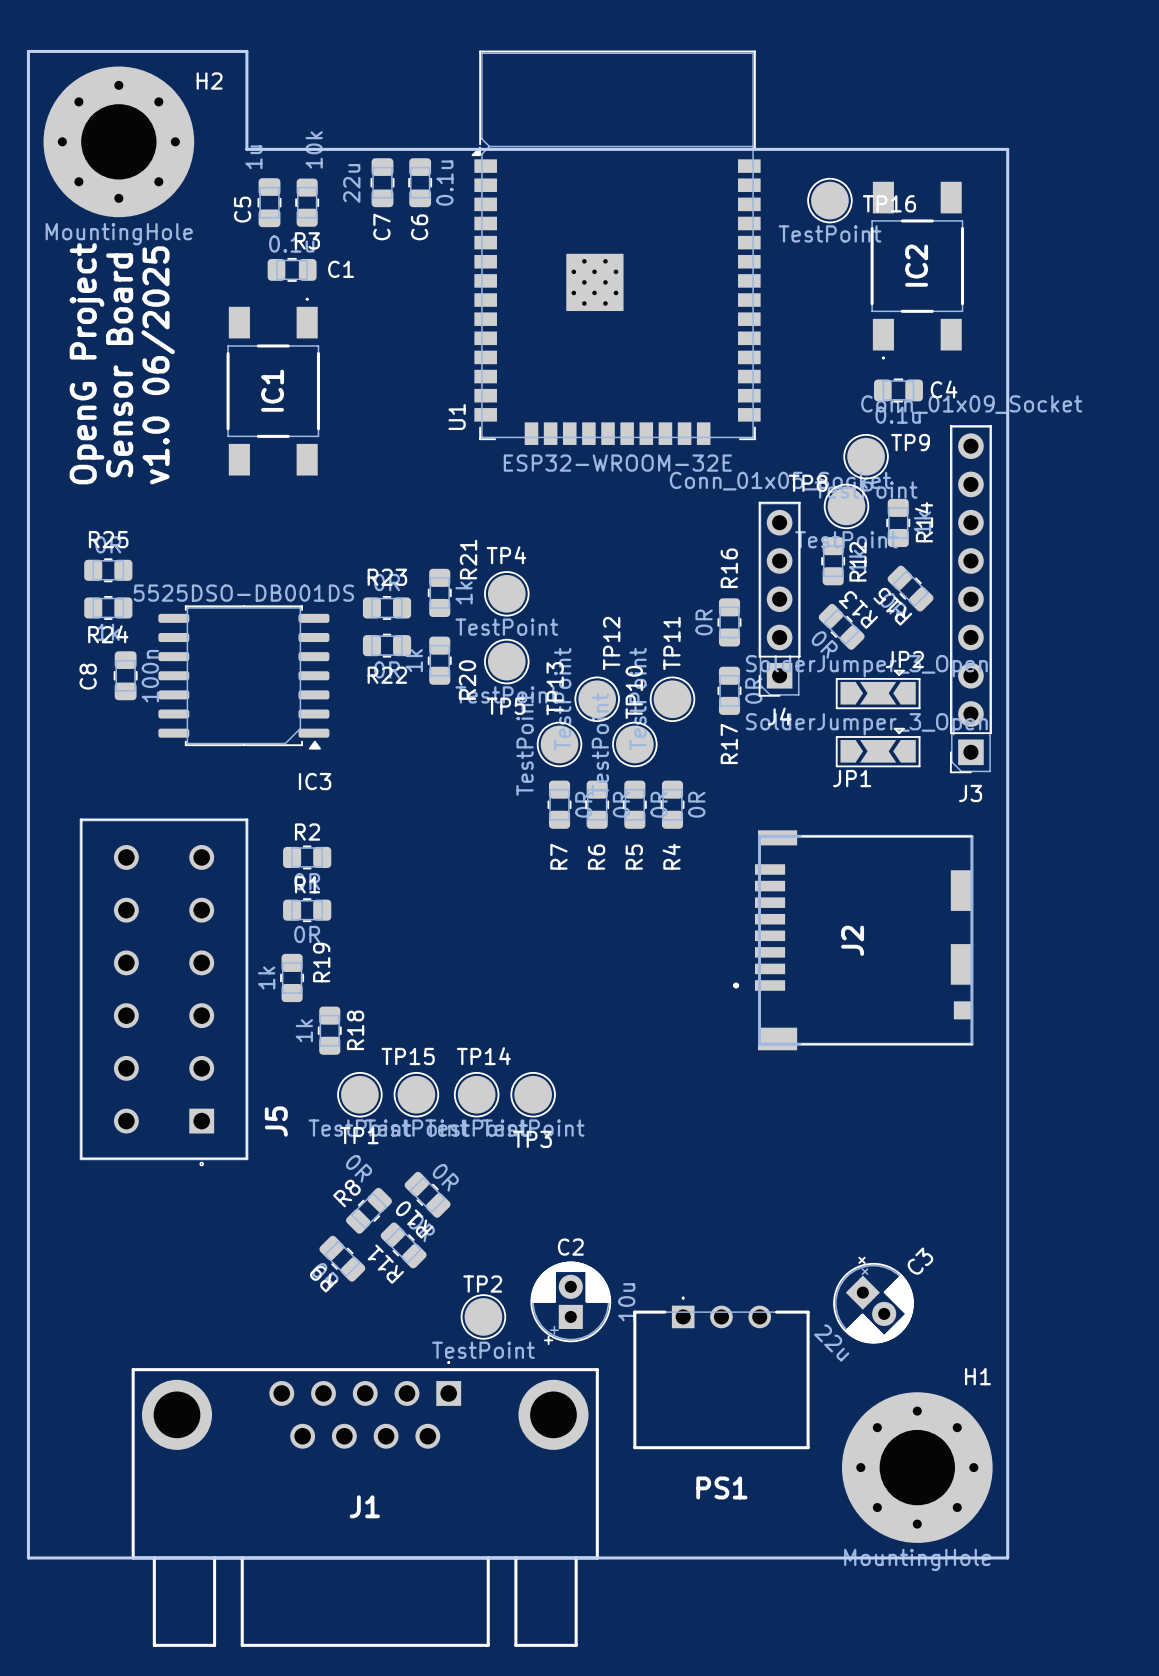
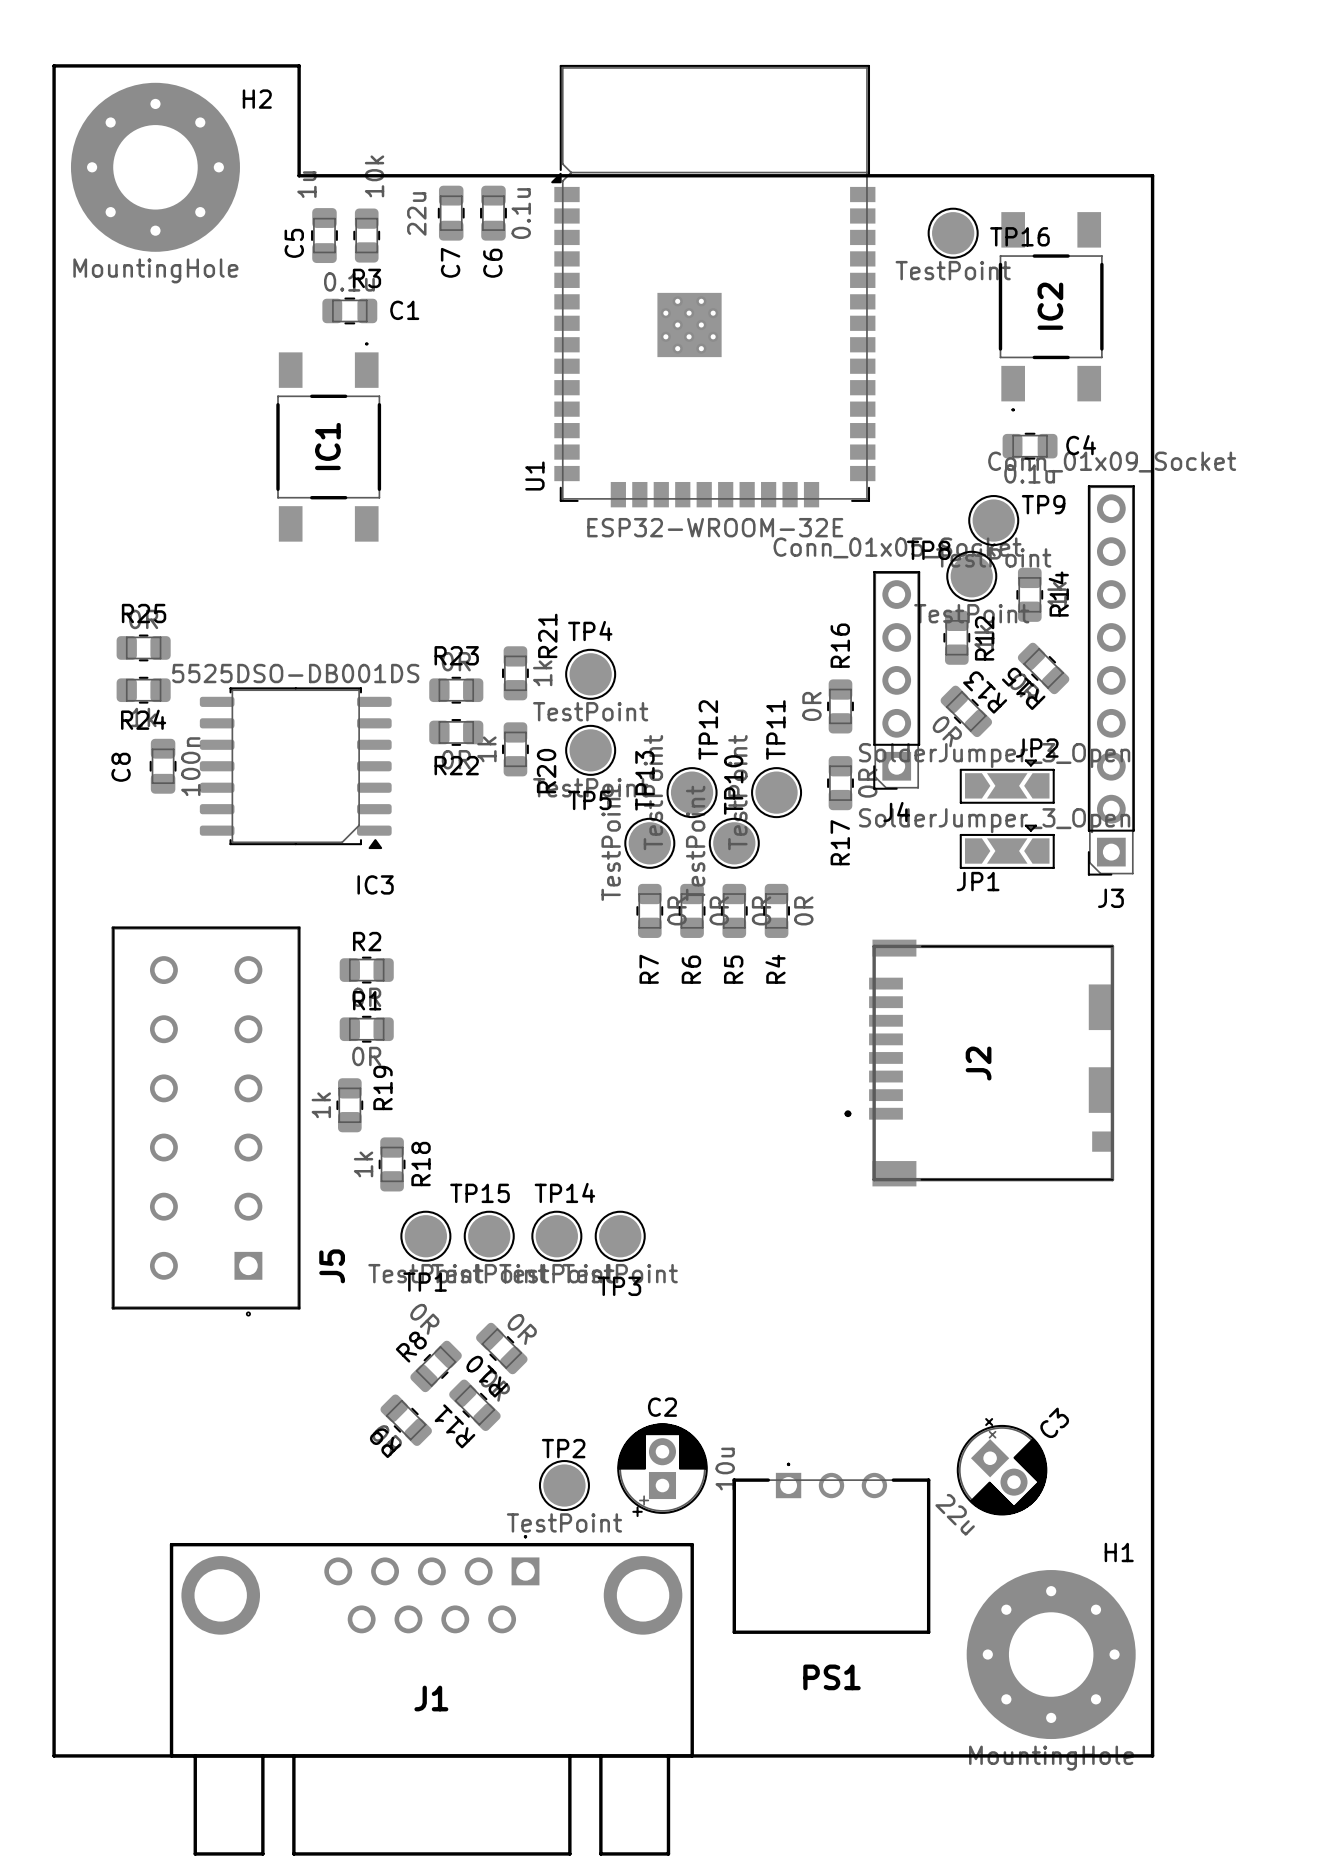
text: OpenG Project (87, 363) -> none
text: Sensor Board (119, 365) -> none
text: v1.0 06/2025 (158, 365) -> none

